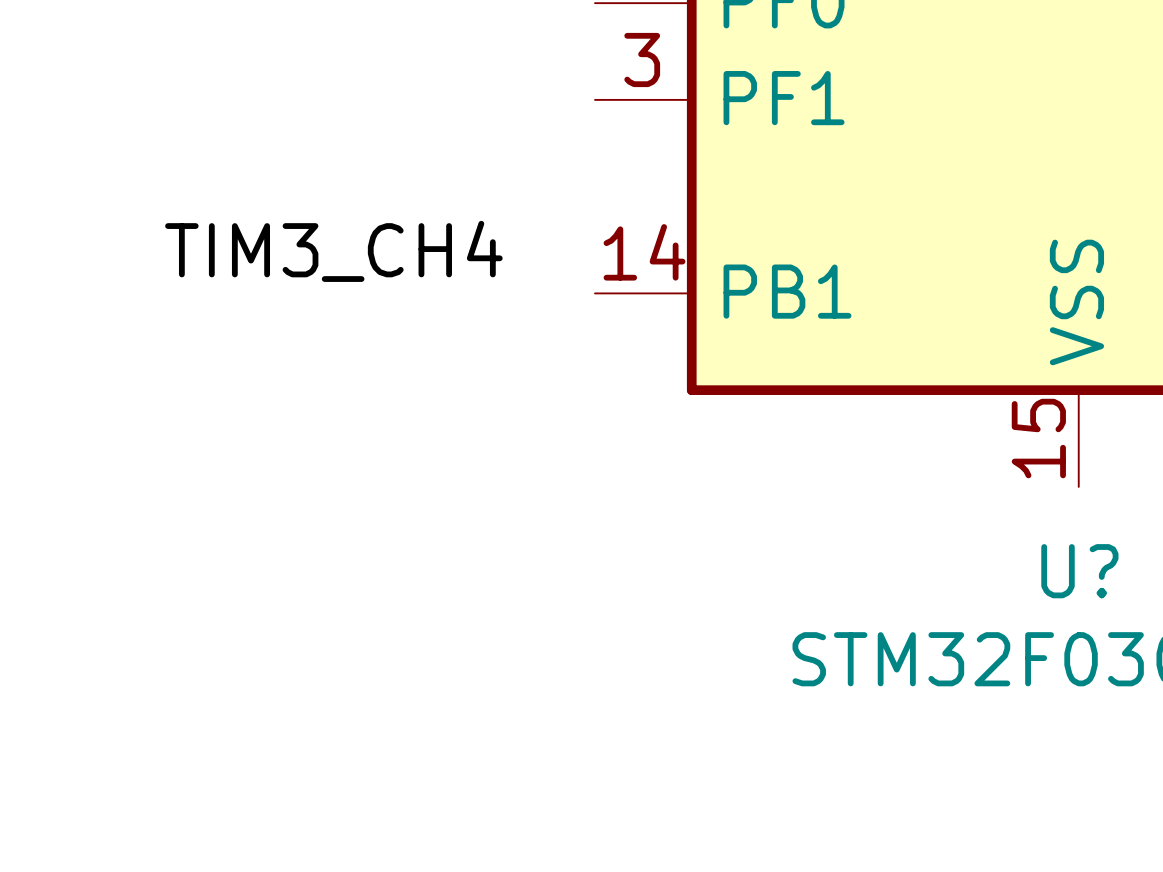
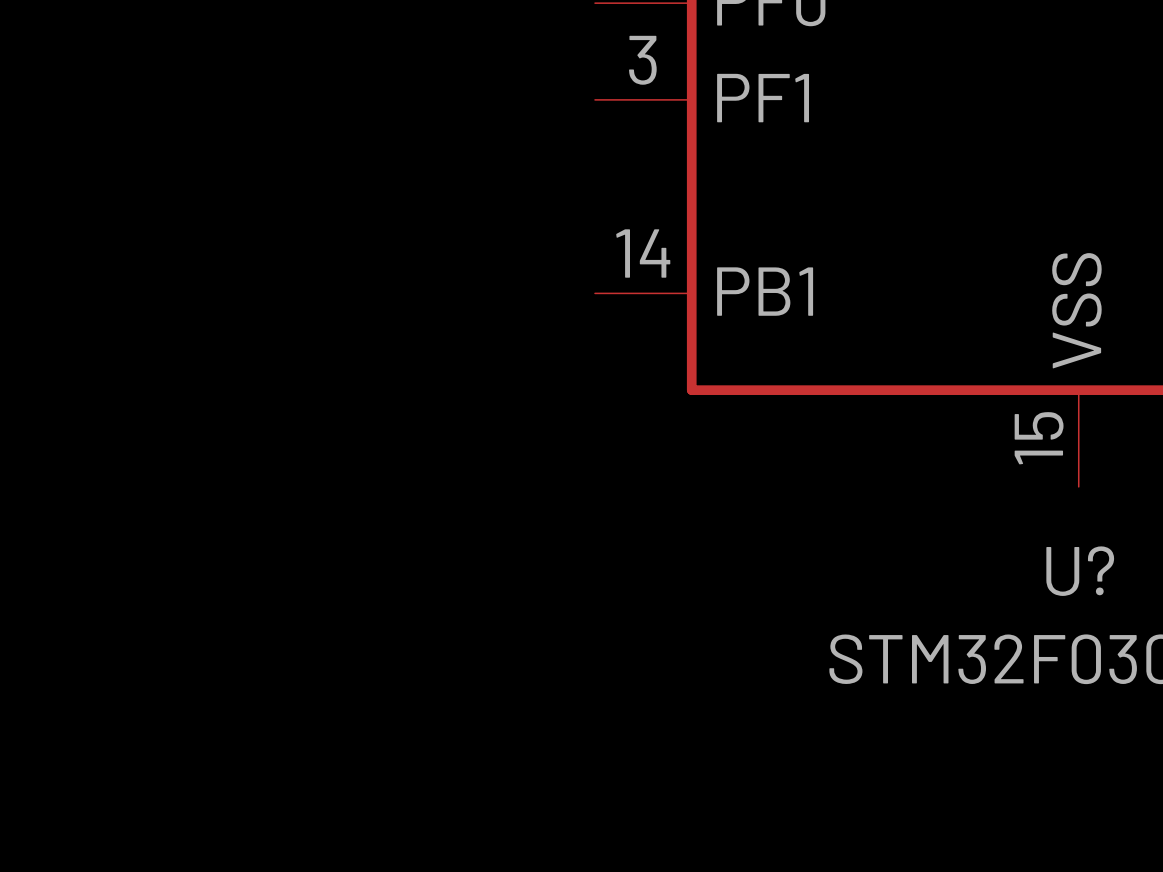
label: TIM3_CH4 (333, 251) -> none

